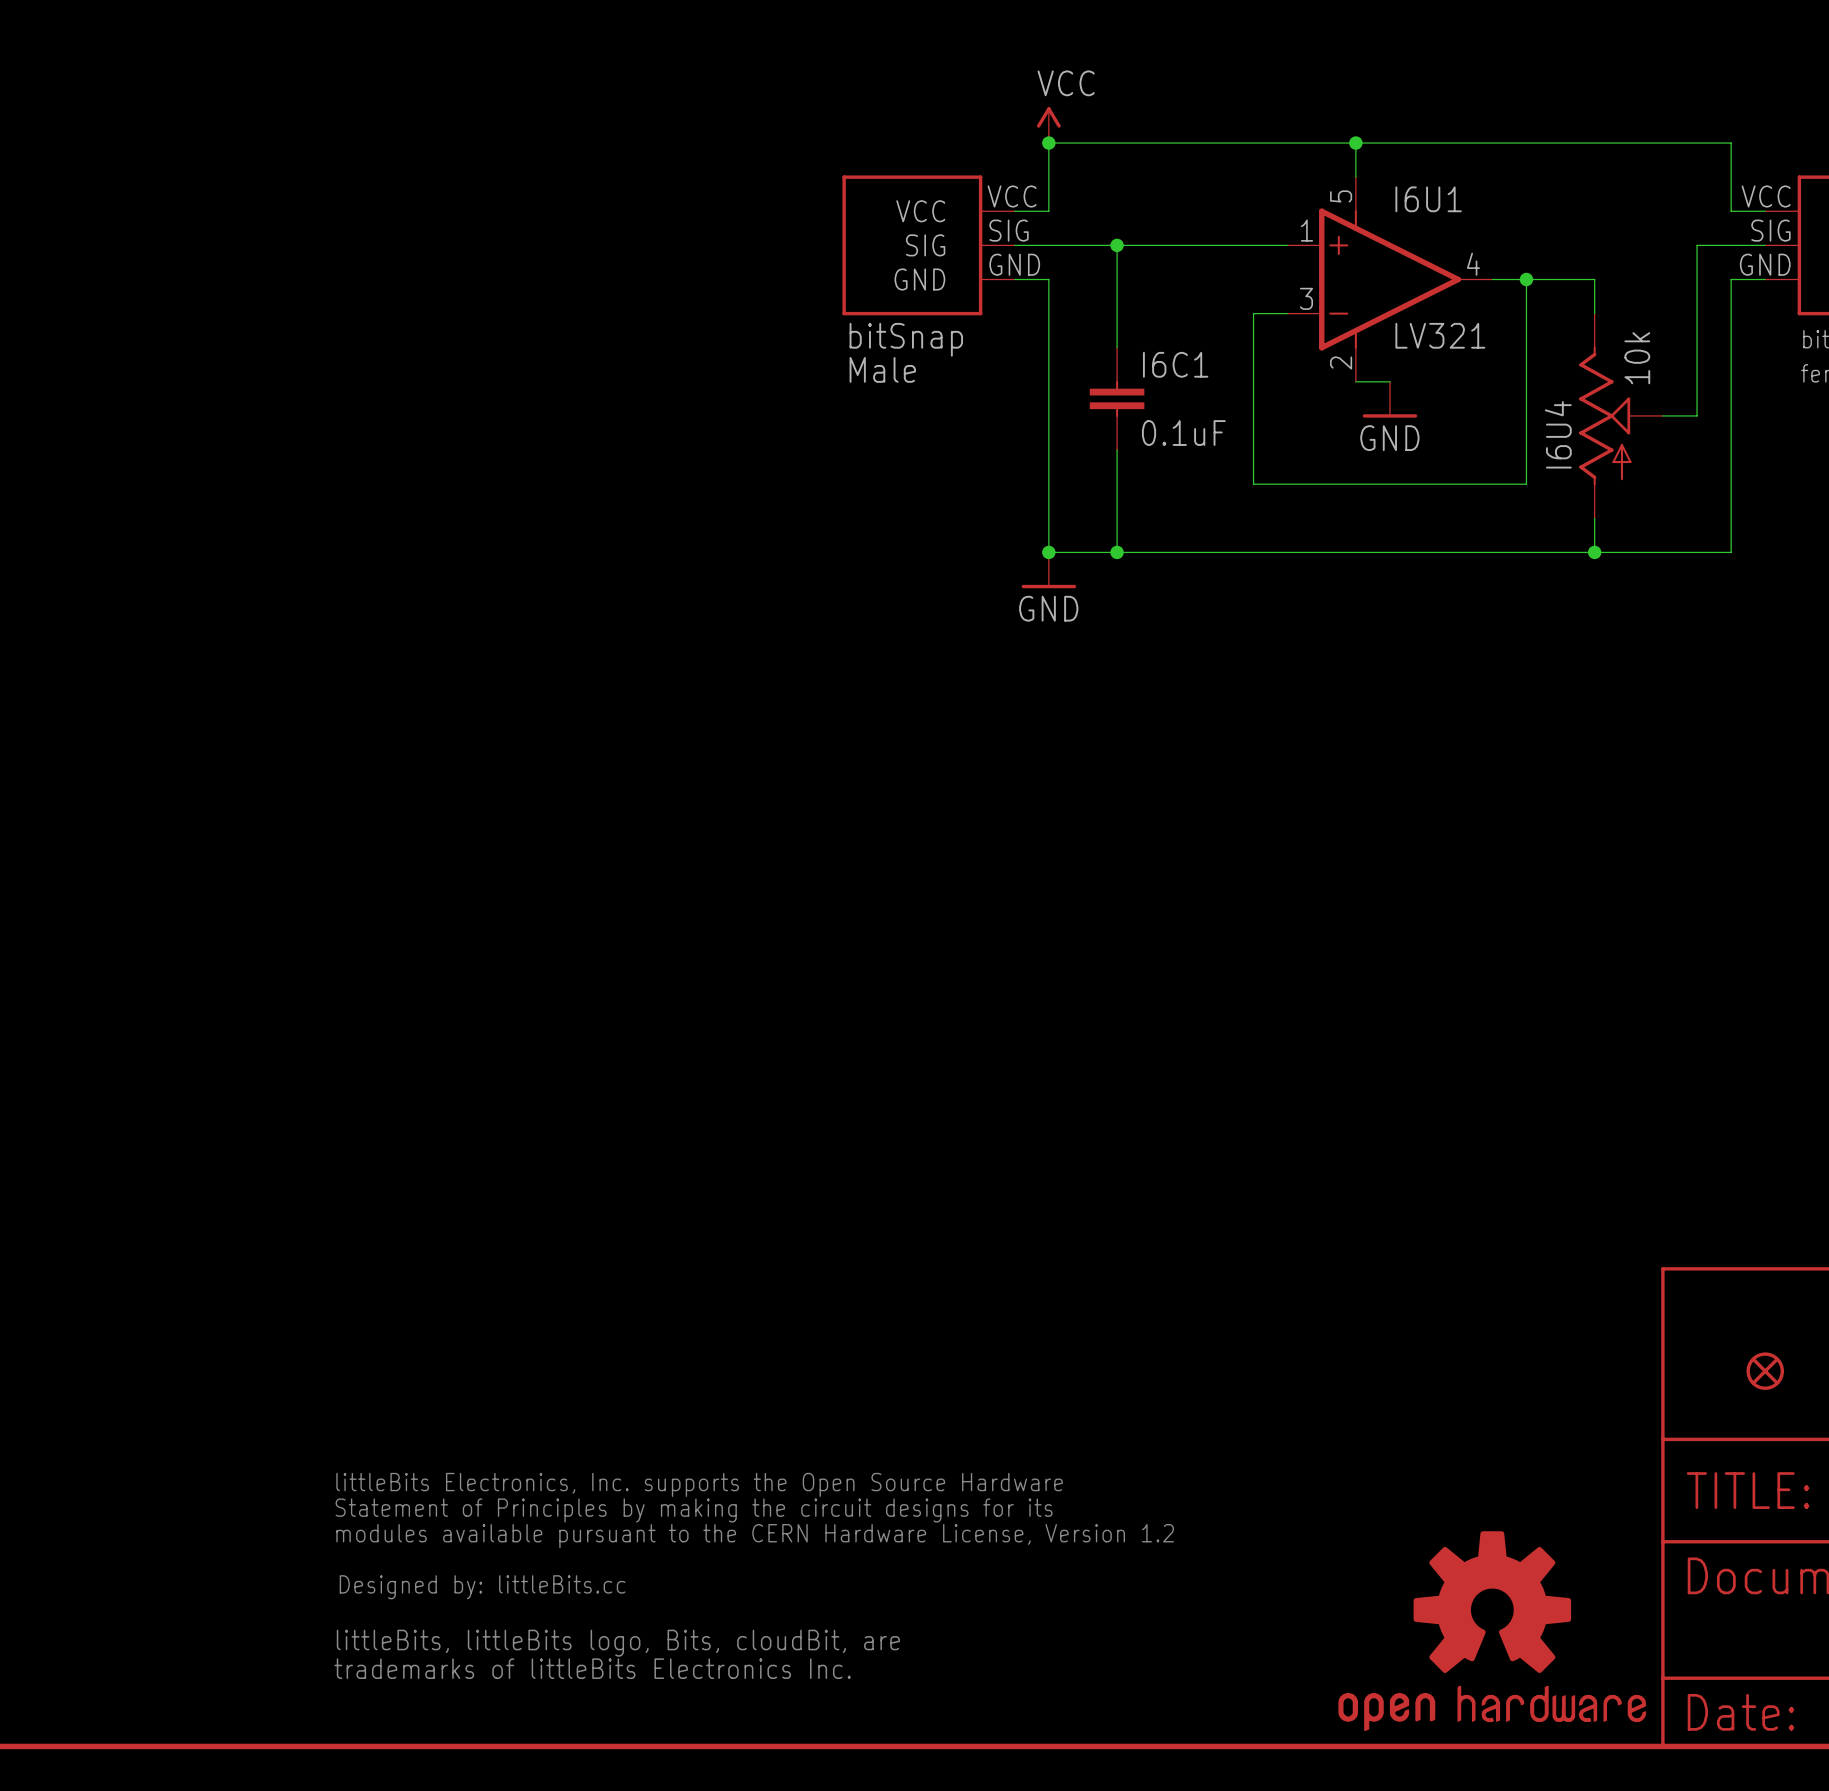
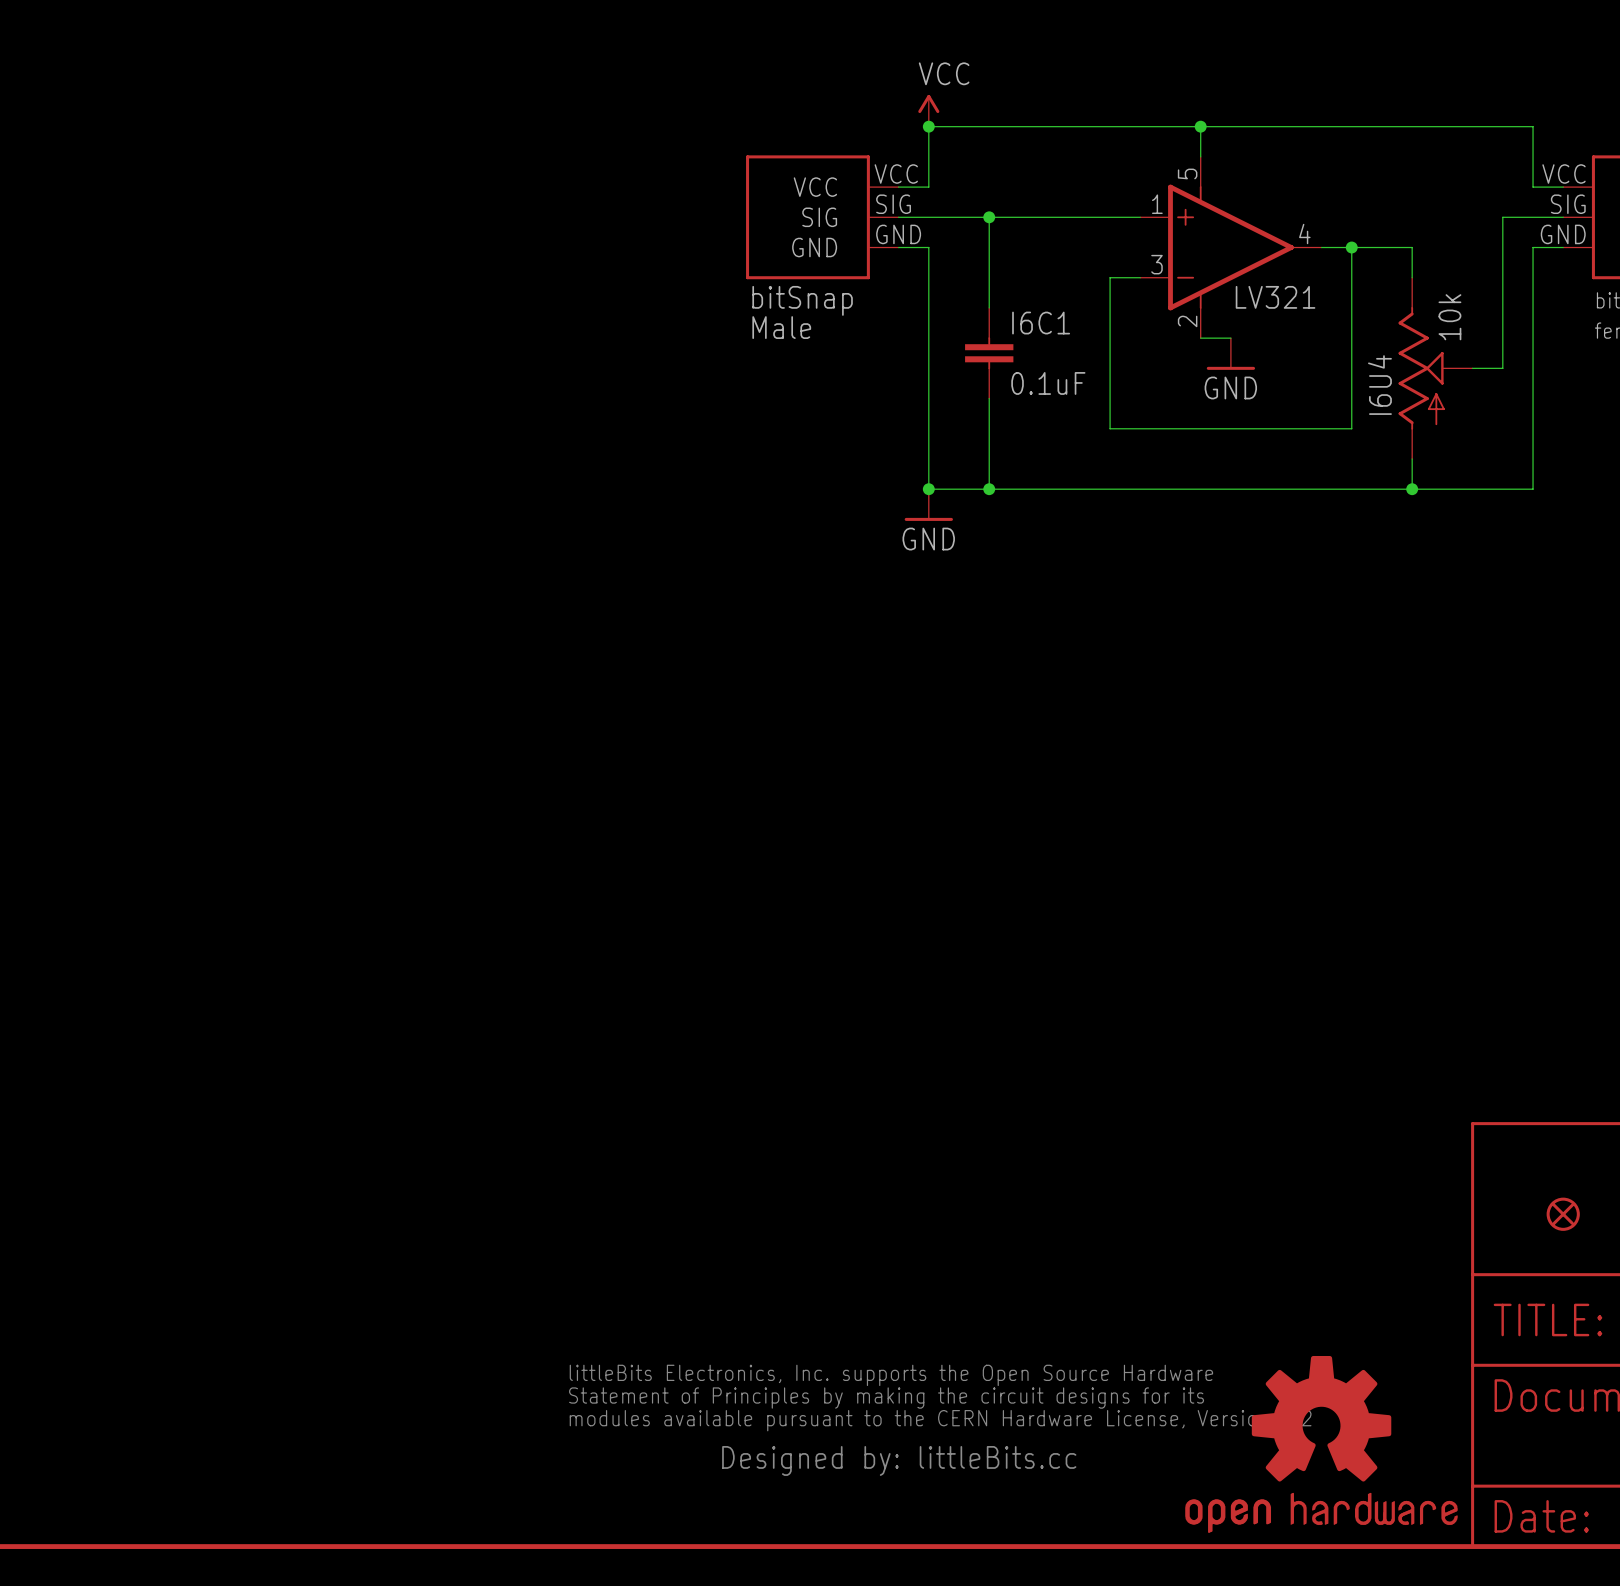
I6U1 name: I6U1 (1428, 199) -> none
part: (754, 1575) -> none
part: none -> (940, 1420)

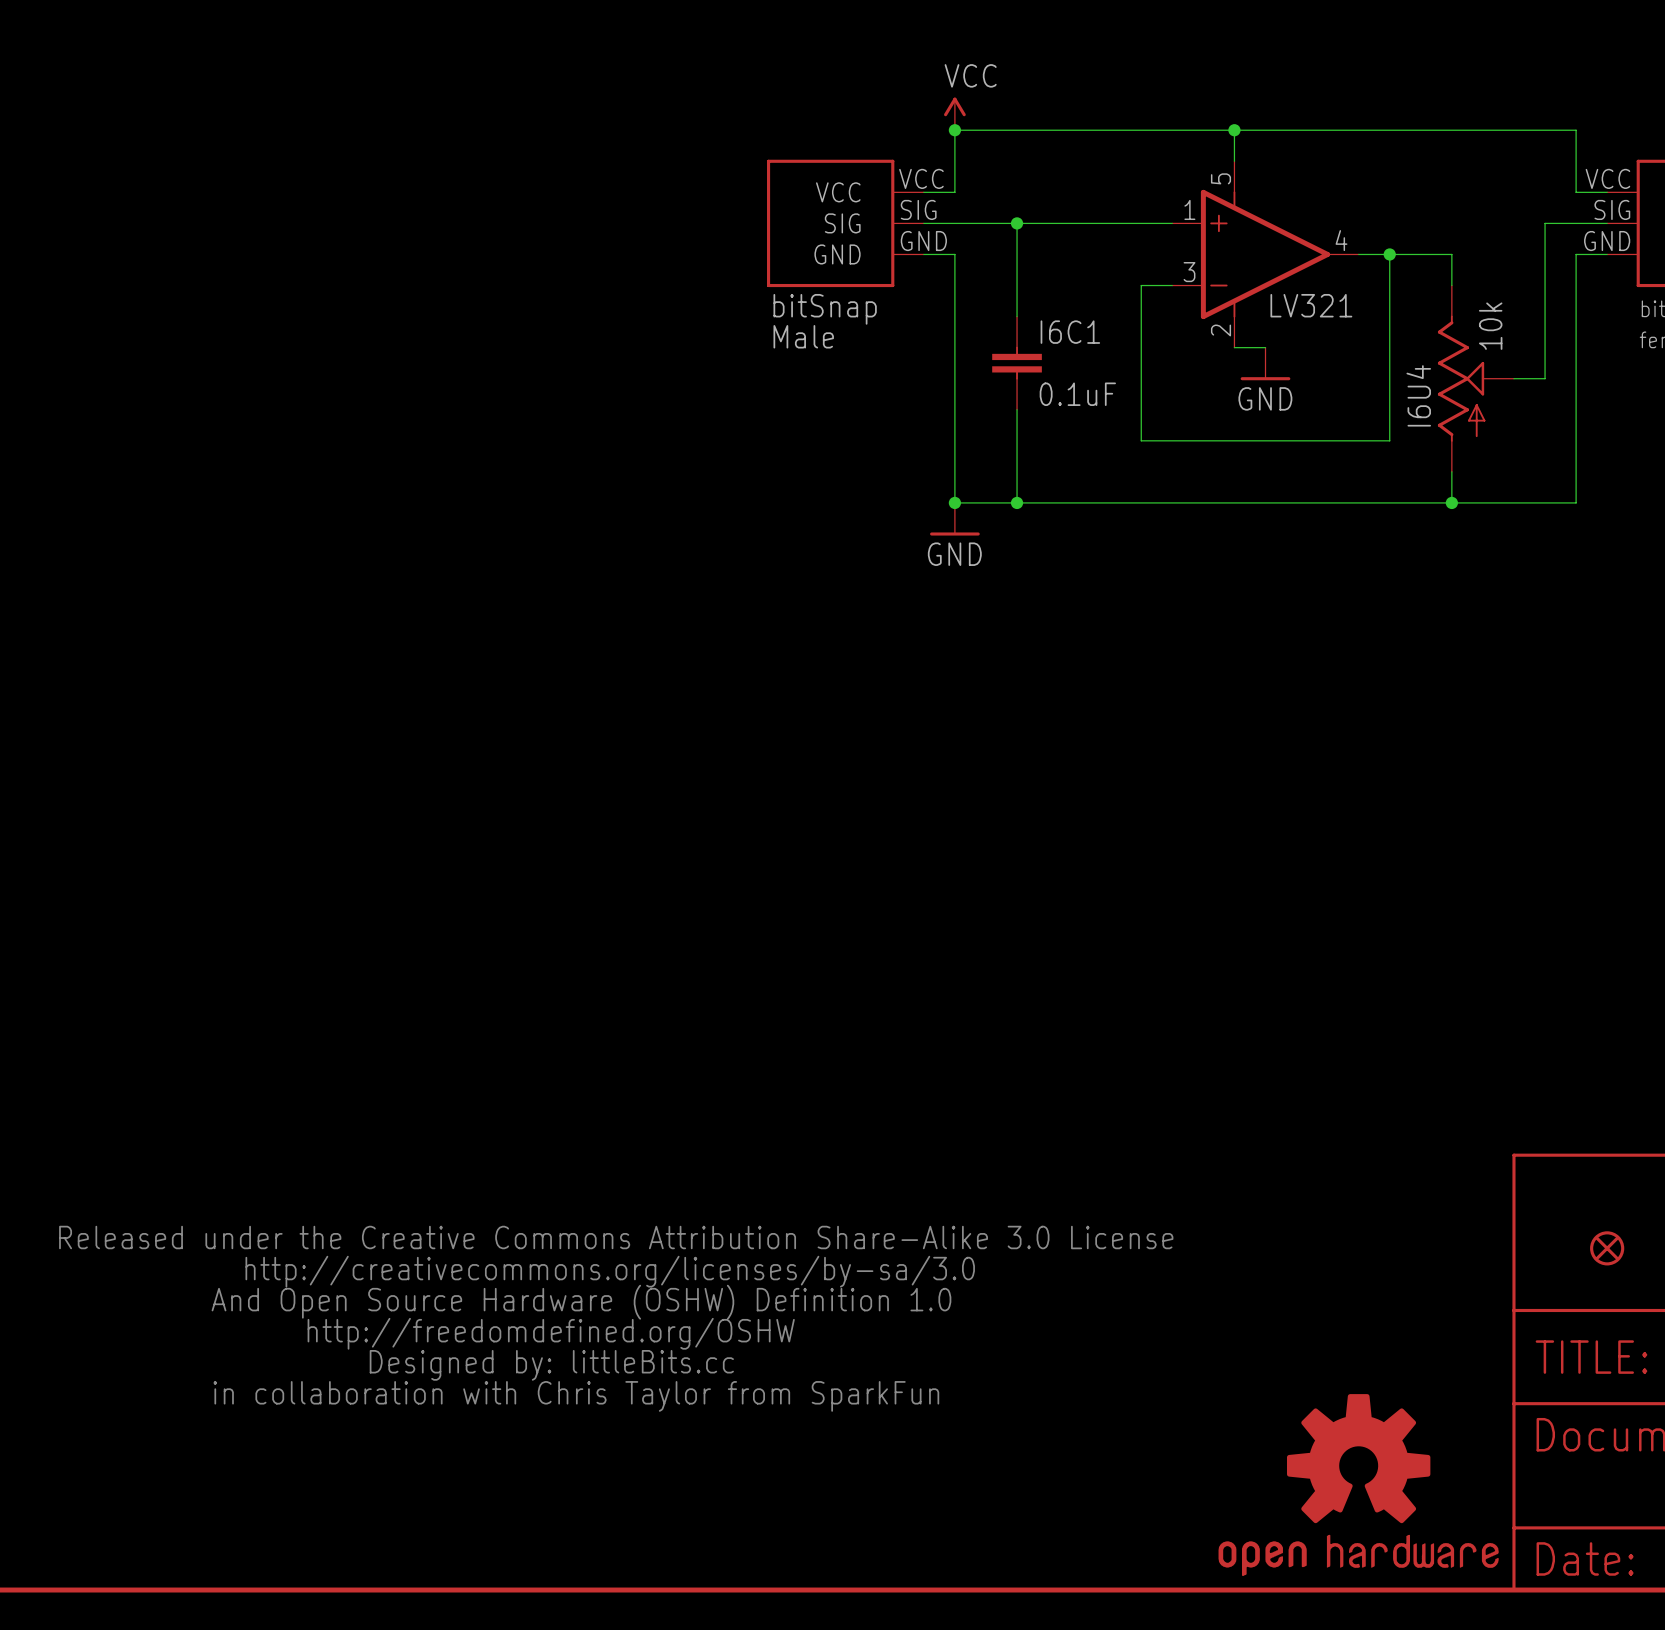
part: none -> (616, 1318)
part: (940, 1420) -> none

